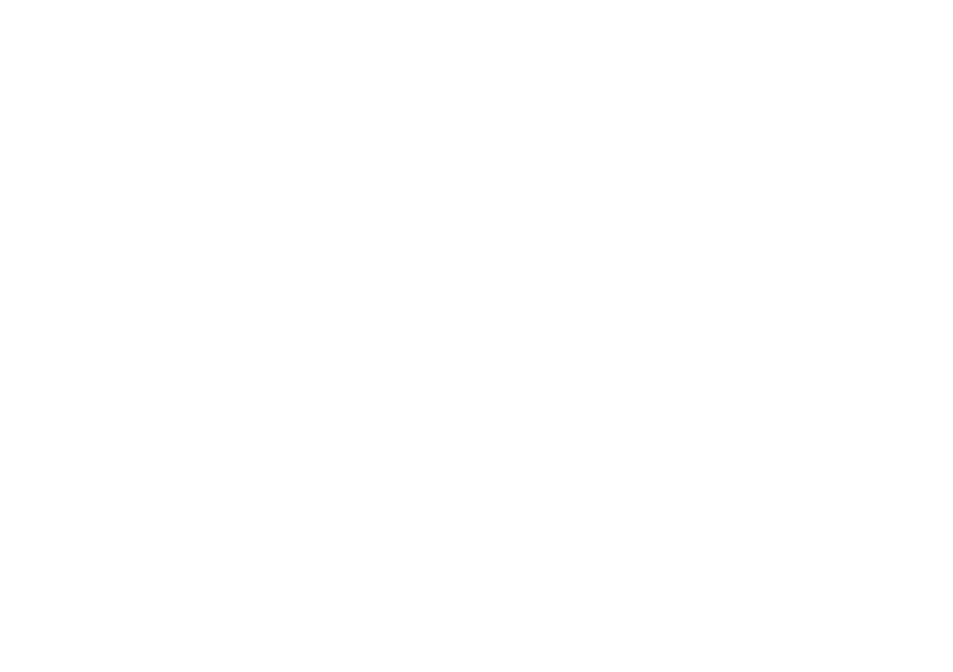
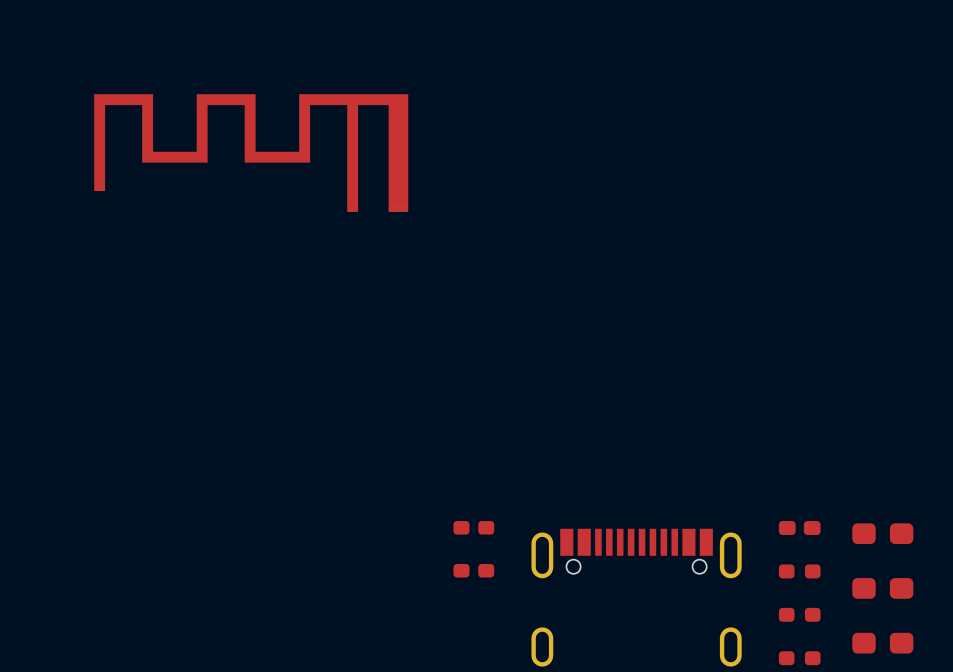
part: none -> (251, 153)
part: none -> (473, 527)
part: none -> (799, 528)
part: none -> (882, 533)
part: none -> (473, 570)
part: none -> (799, 571)
part: none -> (882, 588)
part: none -> (636, 597)
part: none -> (799, 614)
part: none -> (882, 643)
part: none -> (799, 658)

